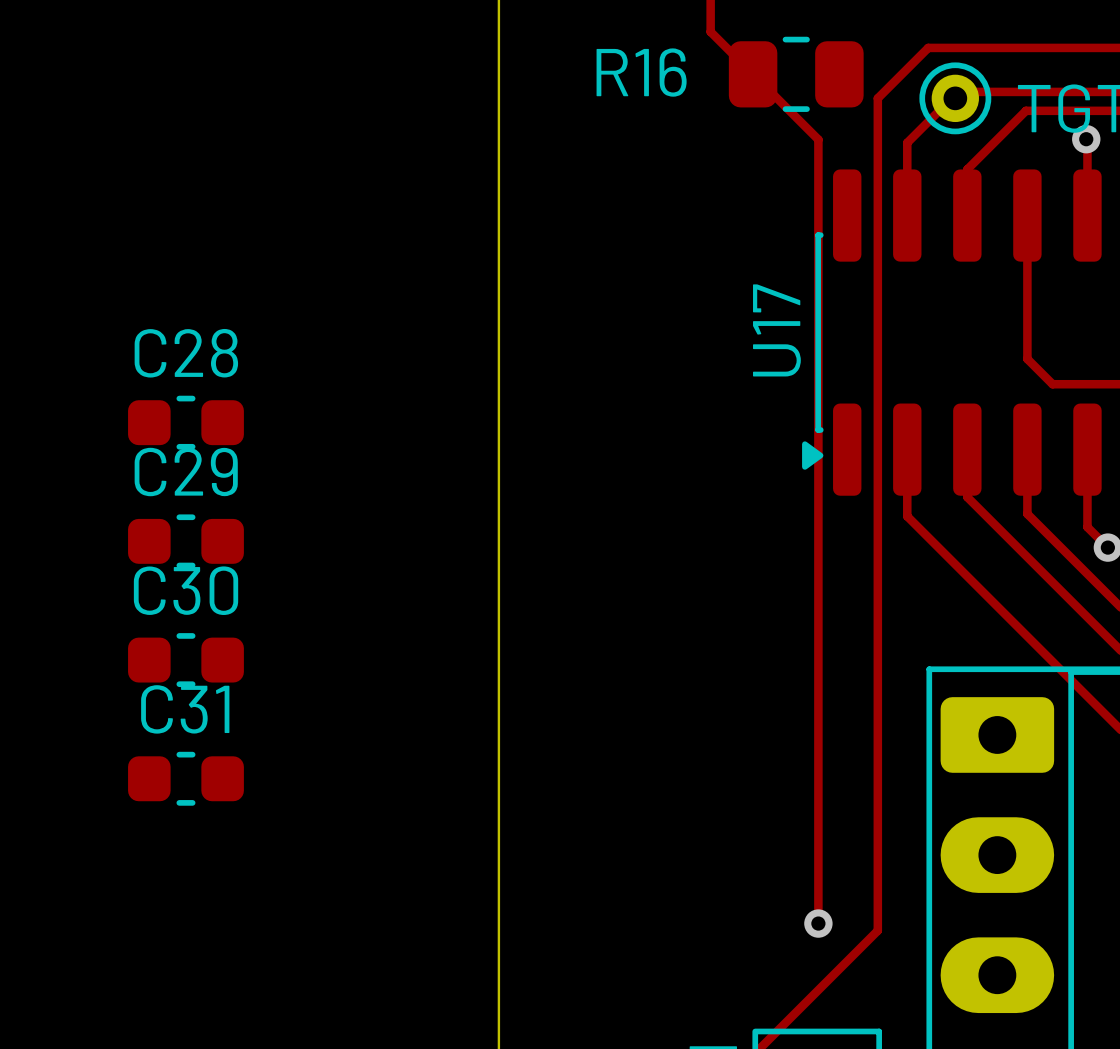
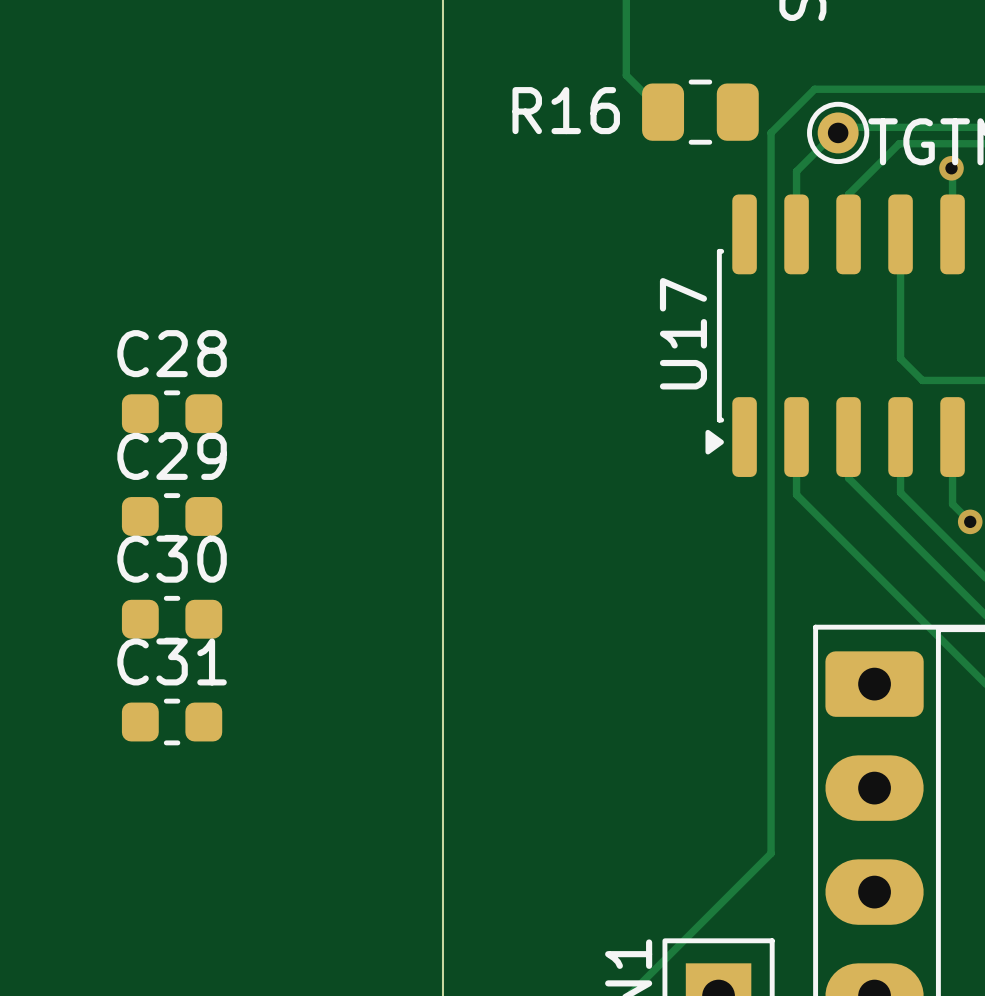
track: (753, 74) (818, 139) (818, 923) -> none
via: (818, 923) -> none

